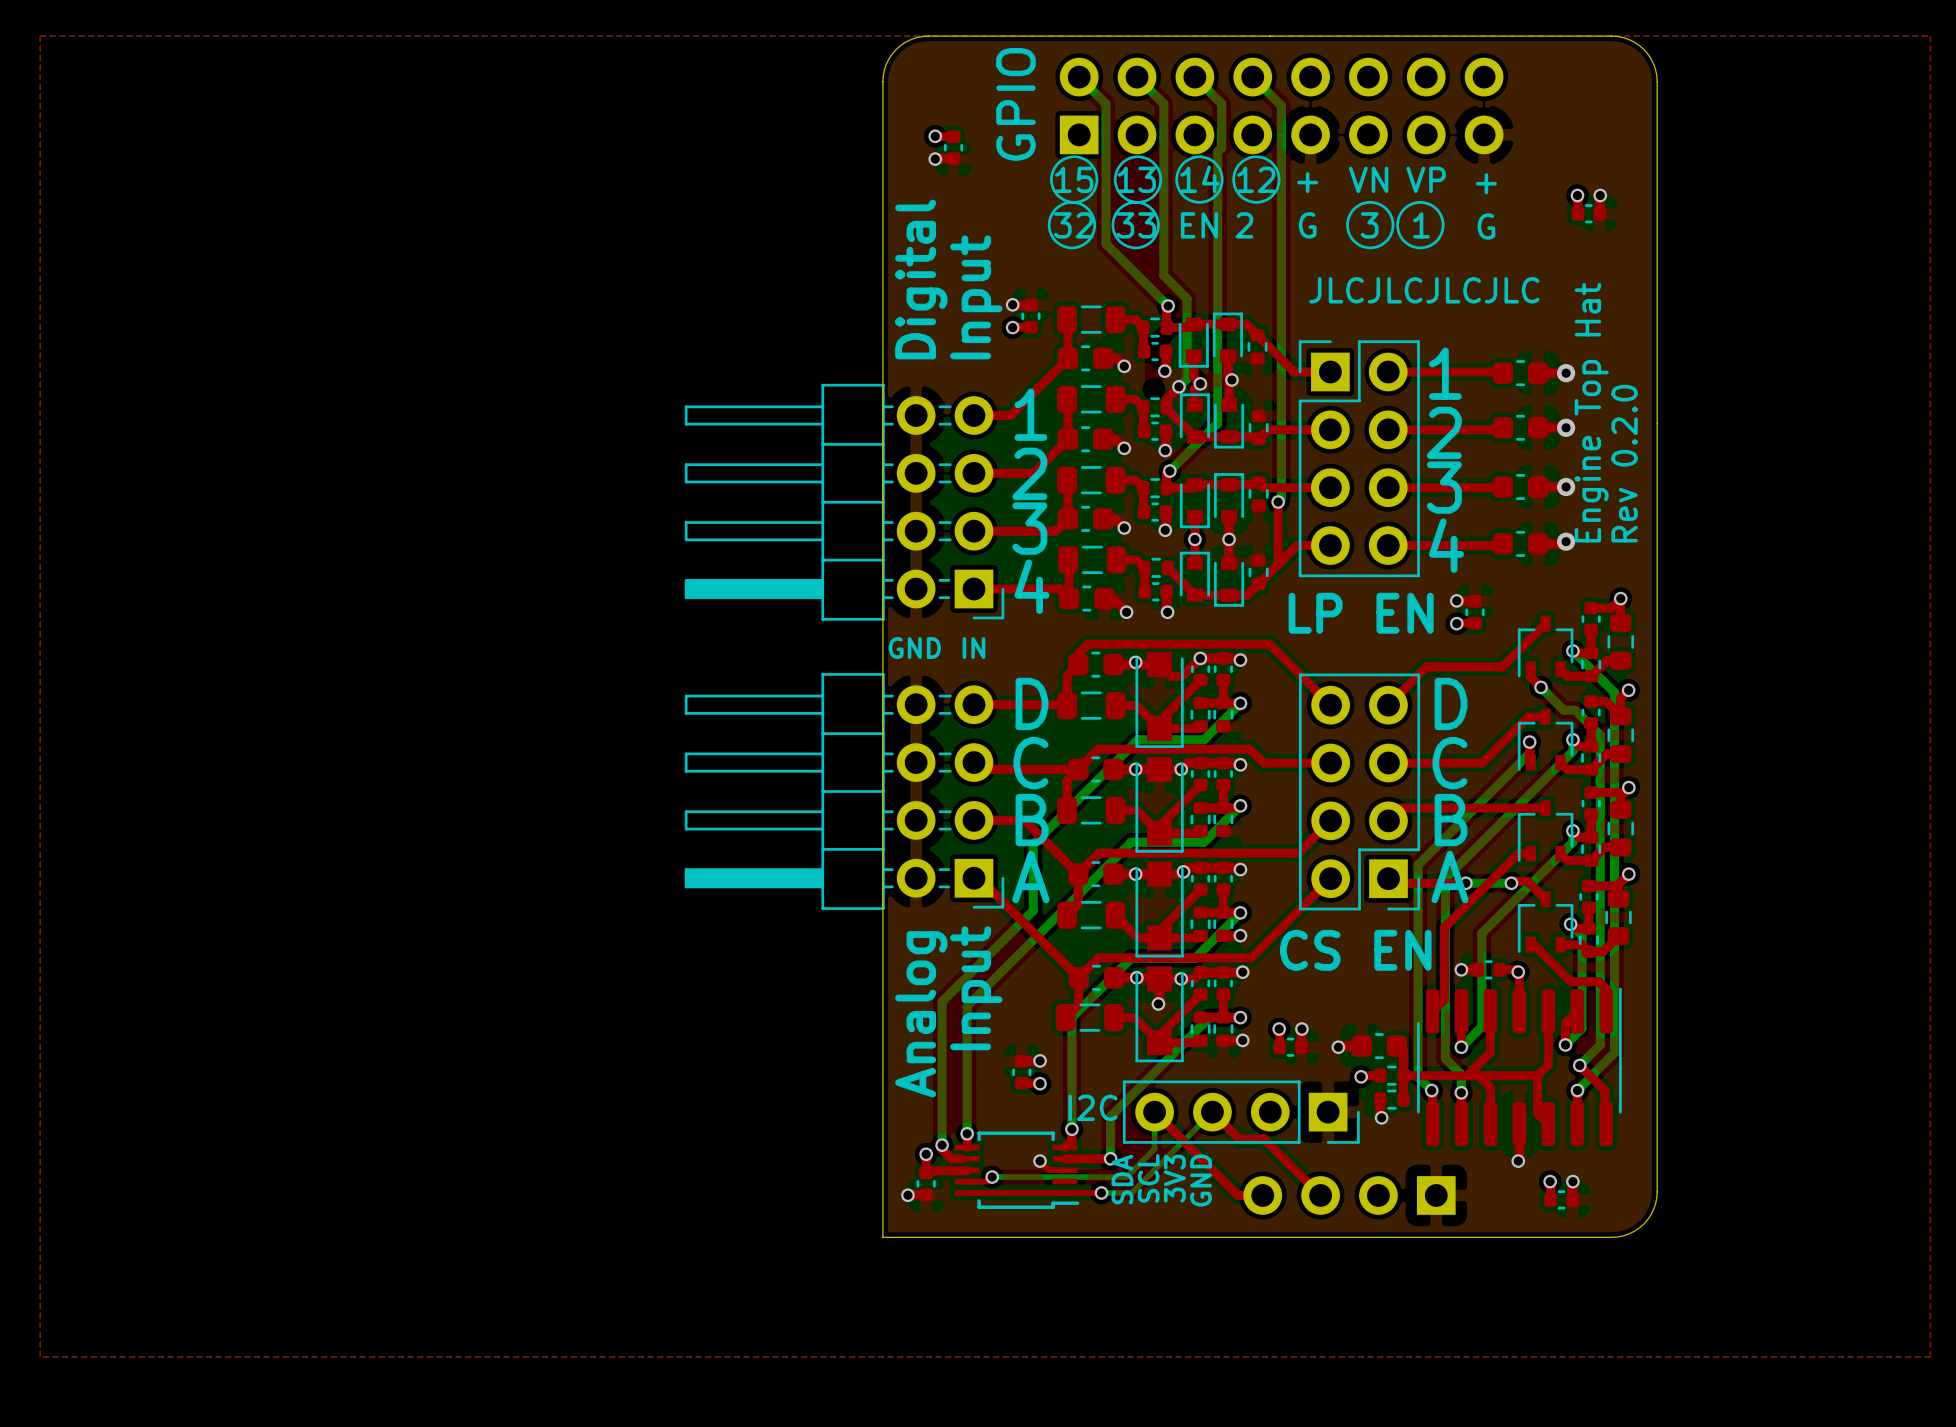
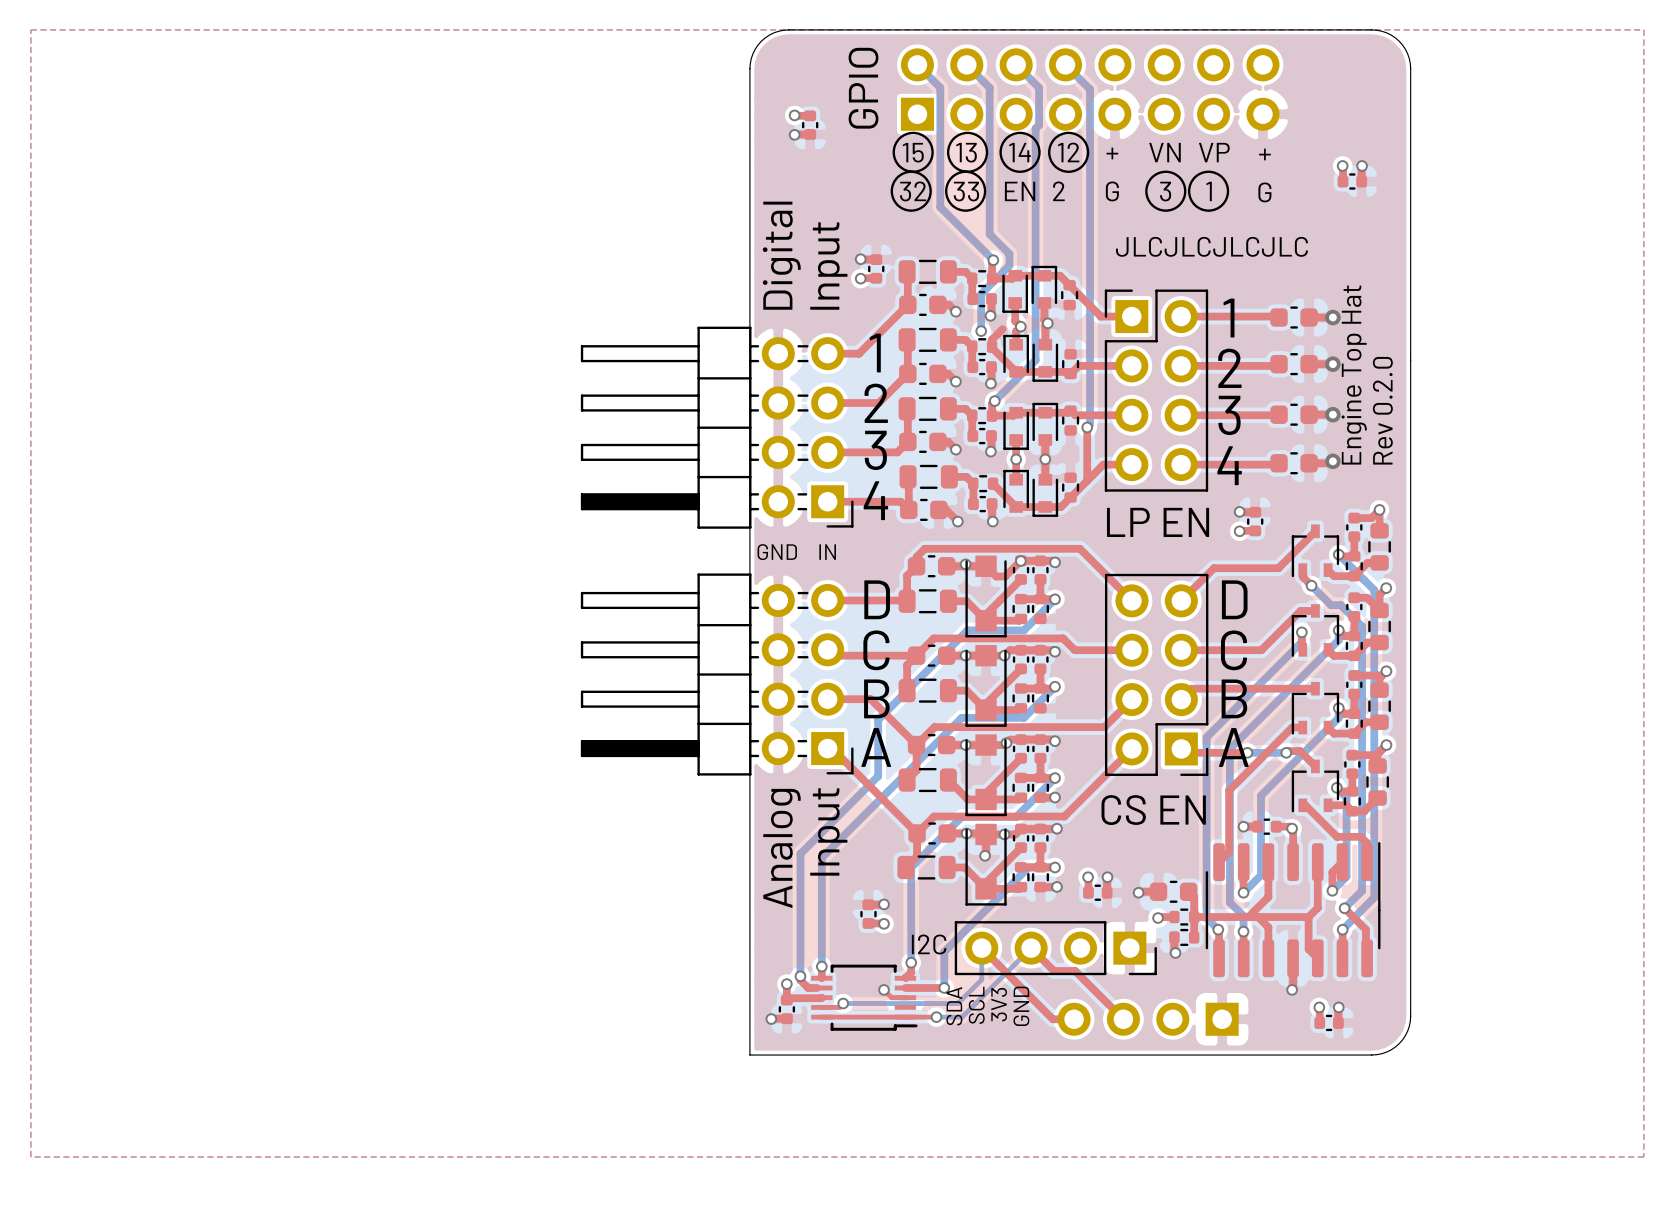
bottom track: (1187, 312) (1187, 378) (1178, 386) -> (1009, 265) (981, 293) (981, 331)
via position: (1178, 386) -> (981, 331)

